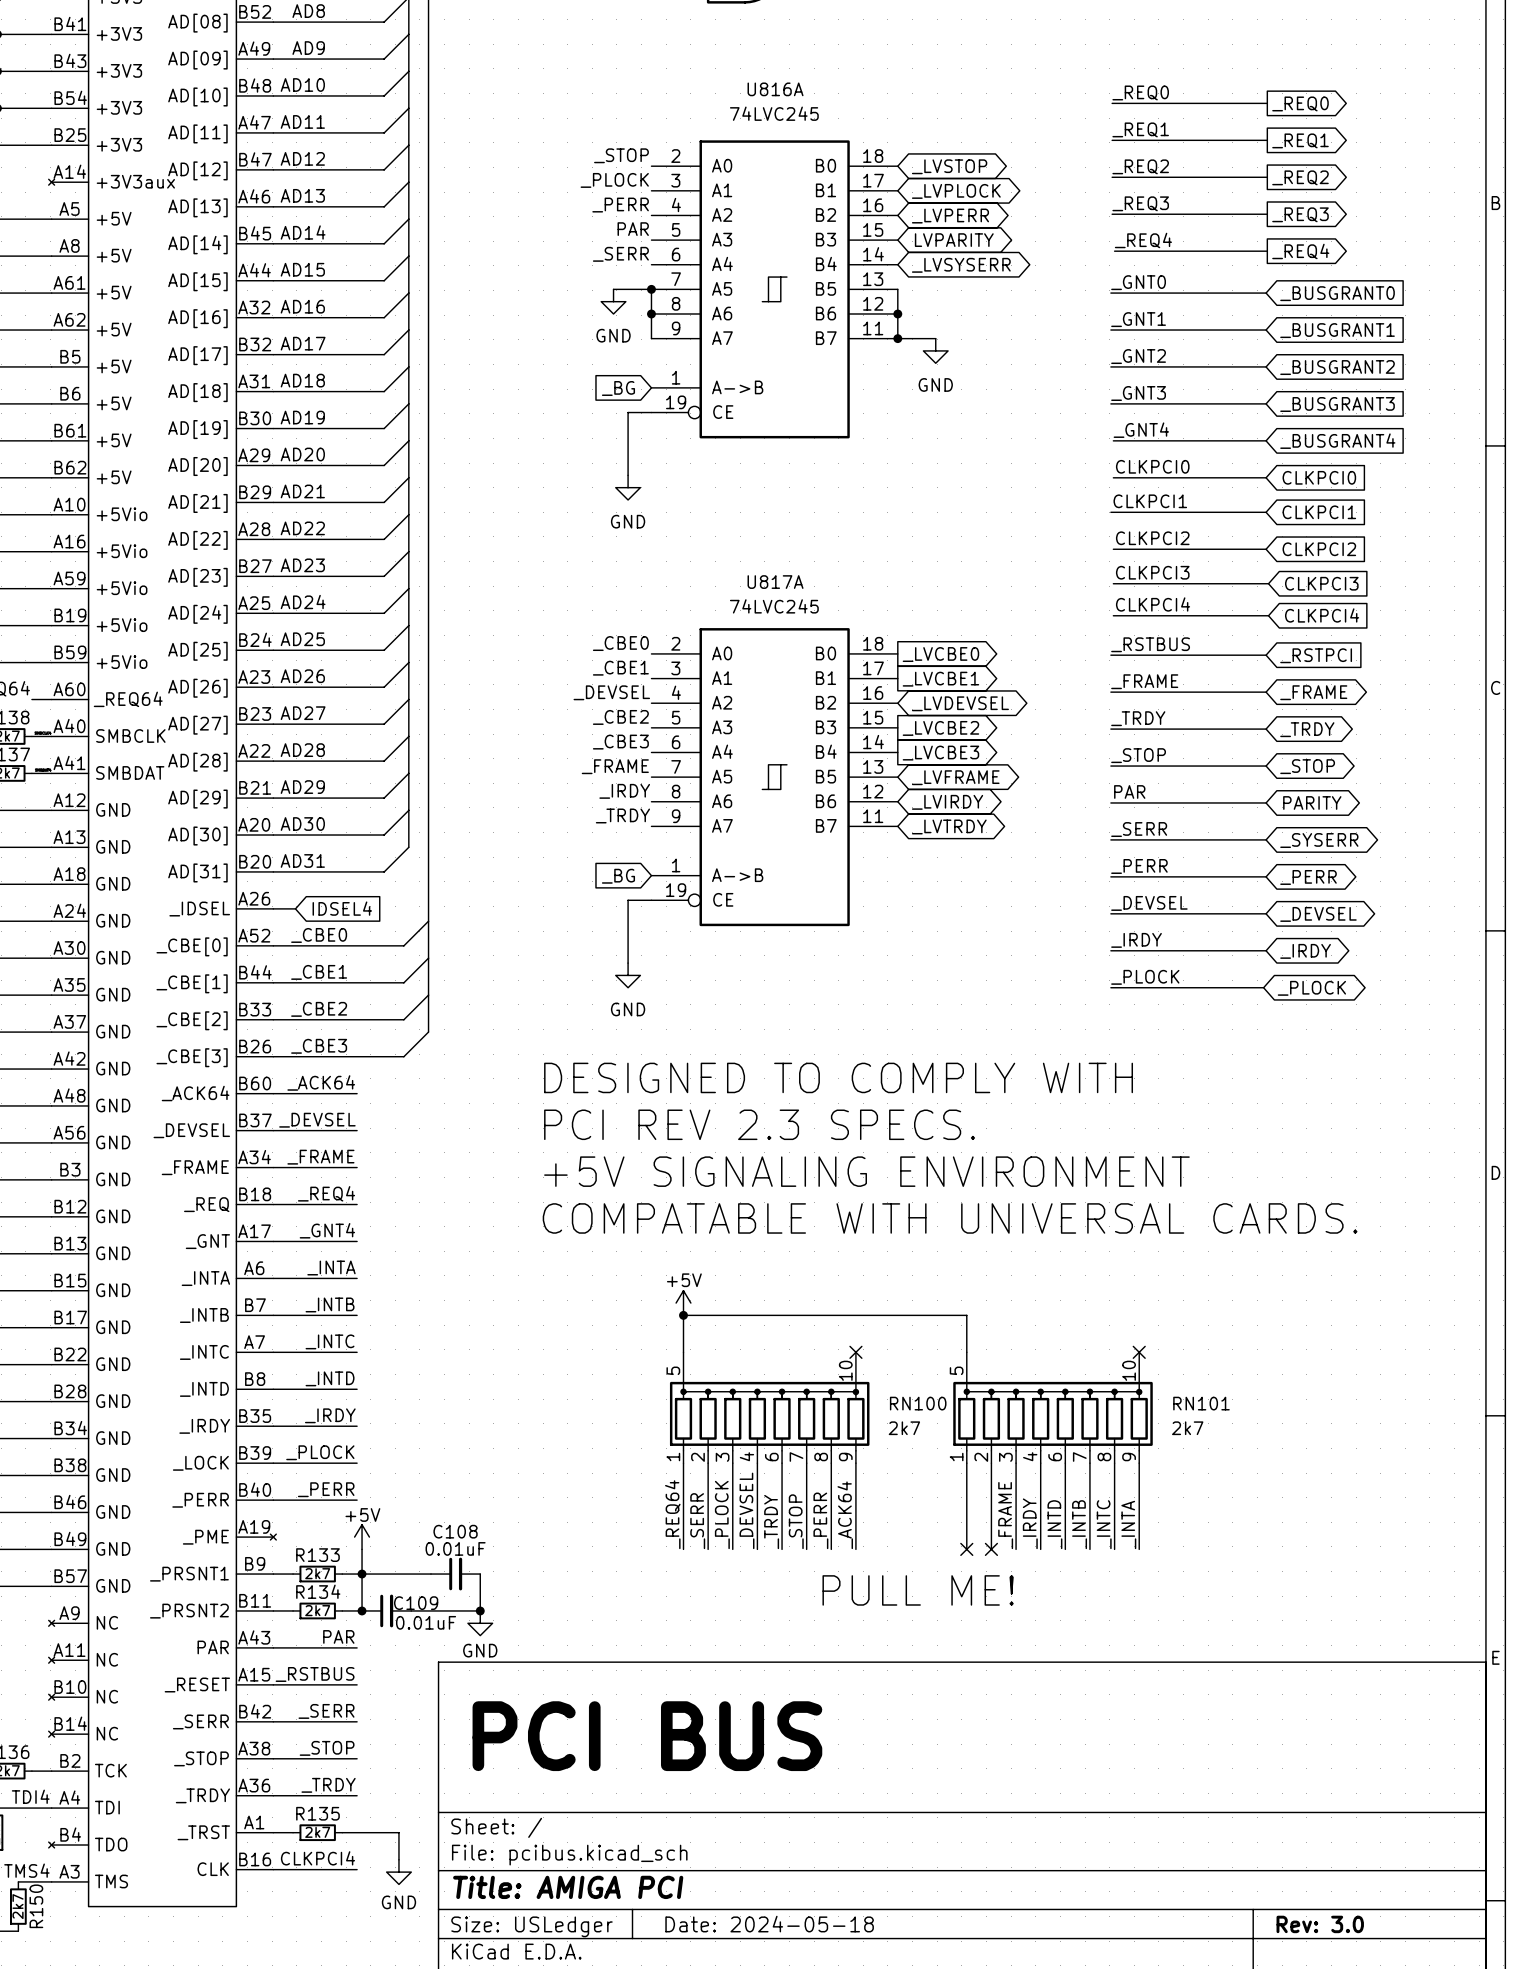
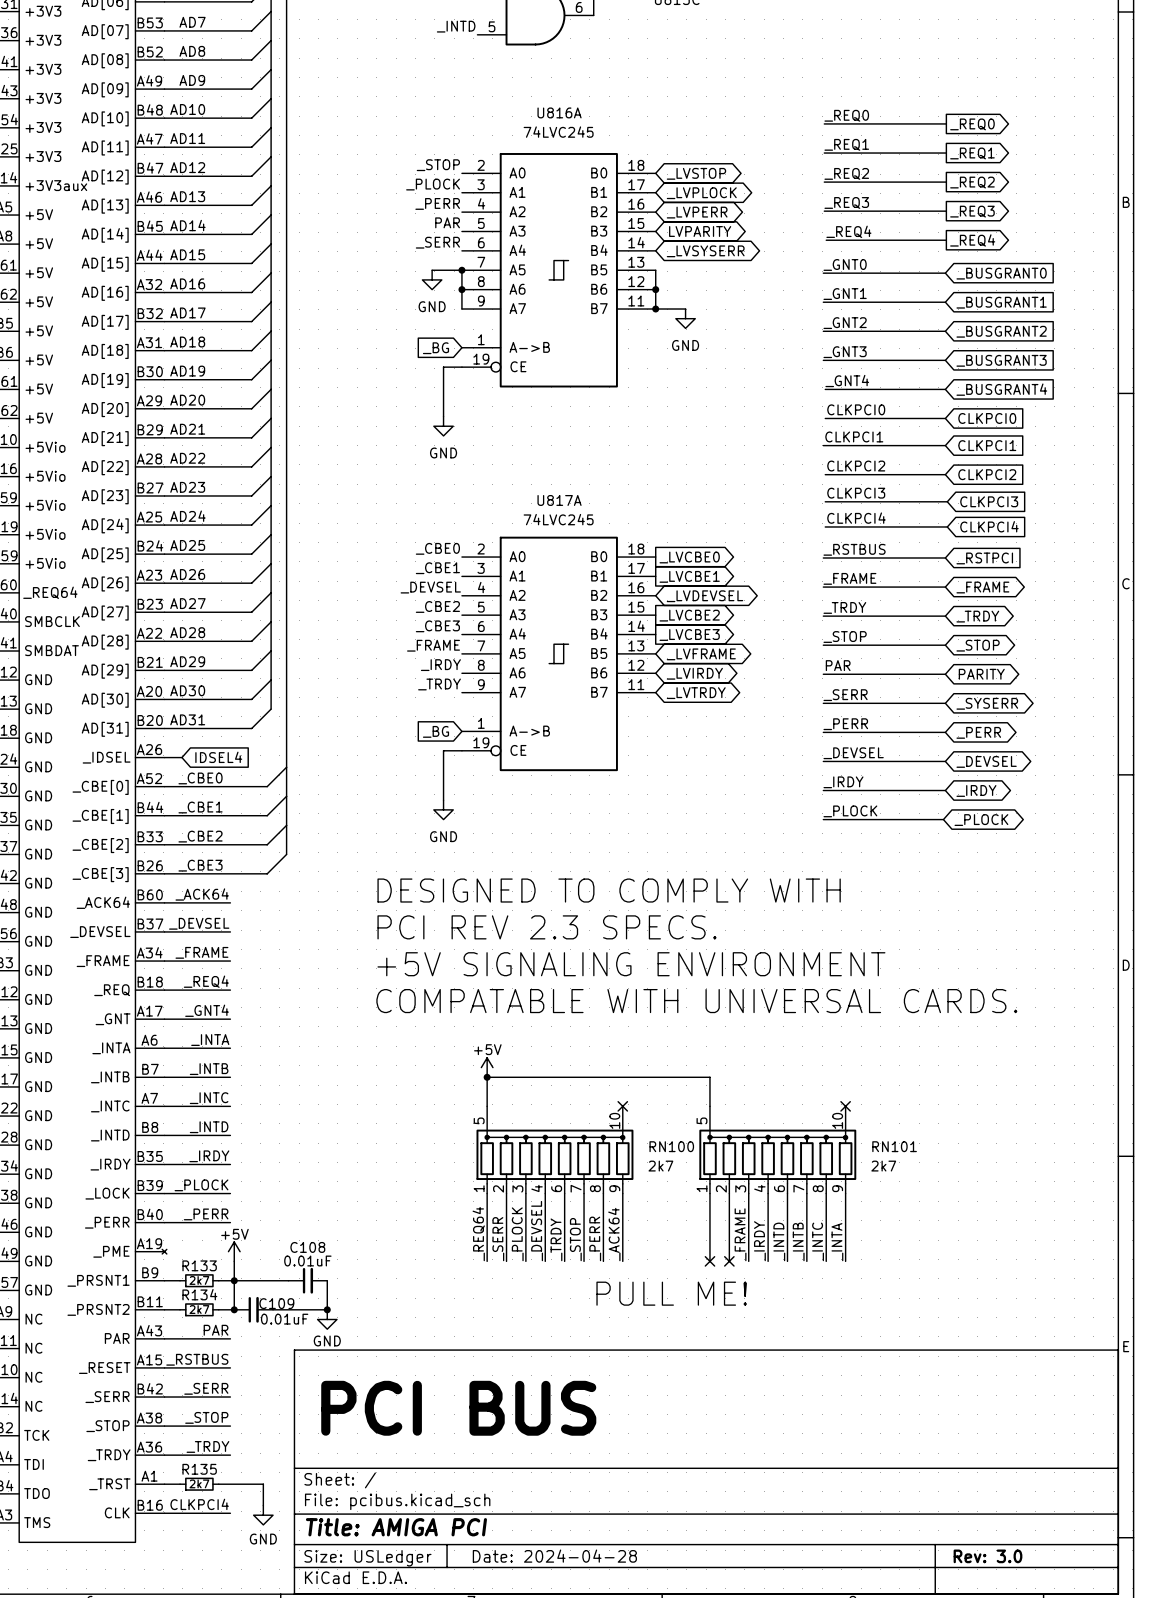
title block: Date: 2024-05-18 (769, 1924) -> Date: 2024-04-28 (554, 1556)

